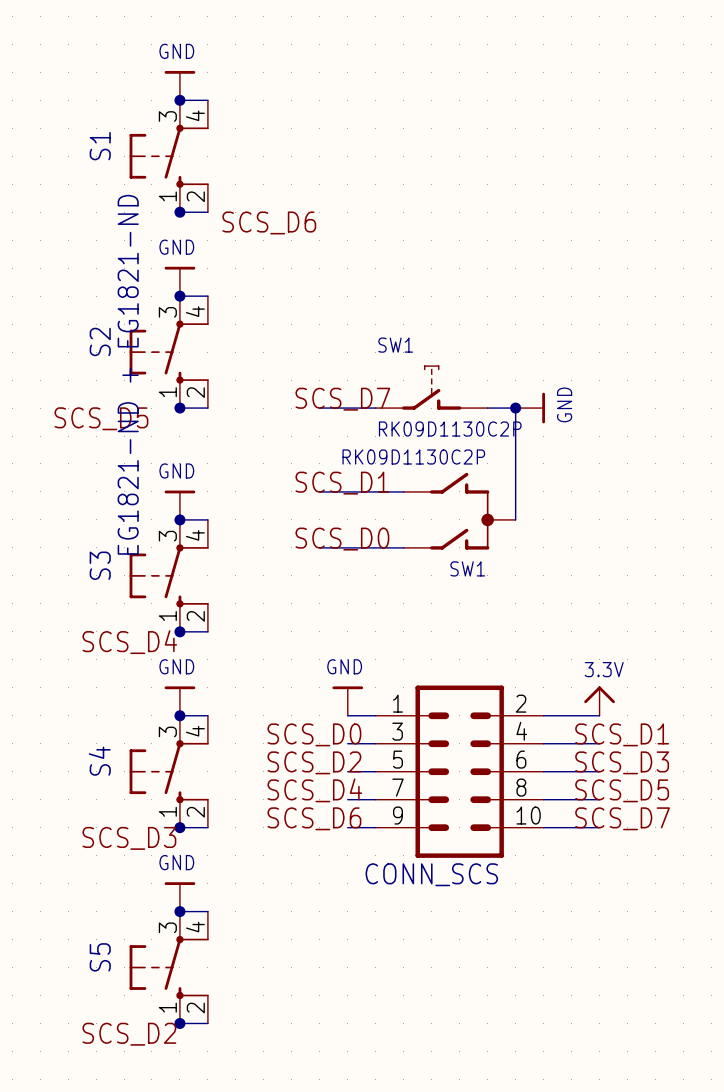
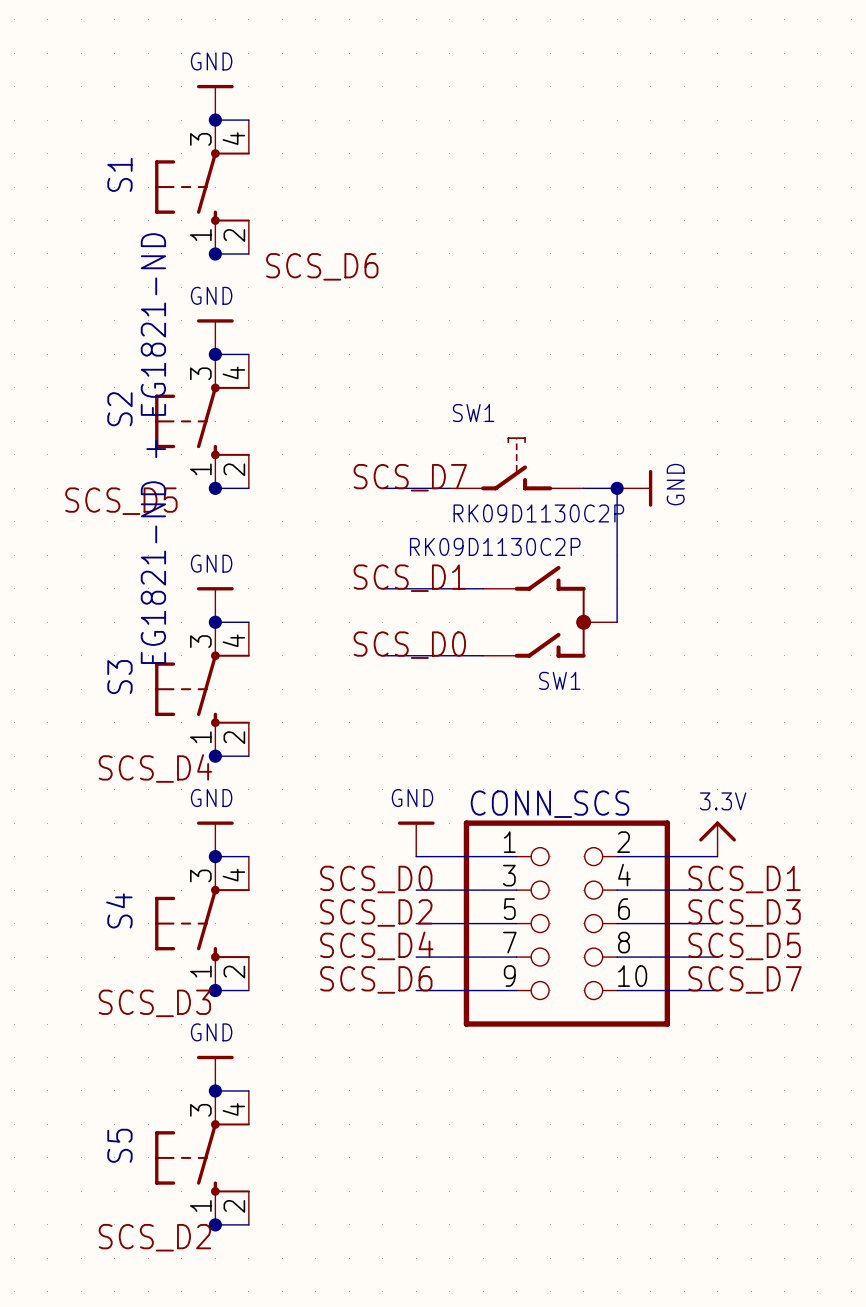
CONN_SCS: (459, 771) -> none
CONN_SCS: none -> (566, 923)

